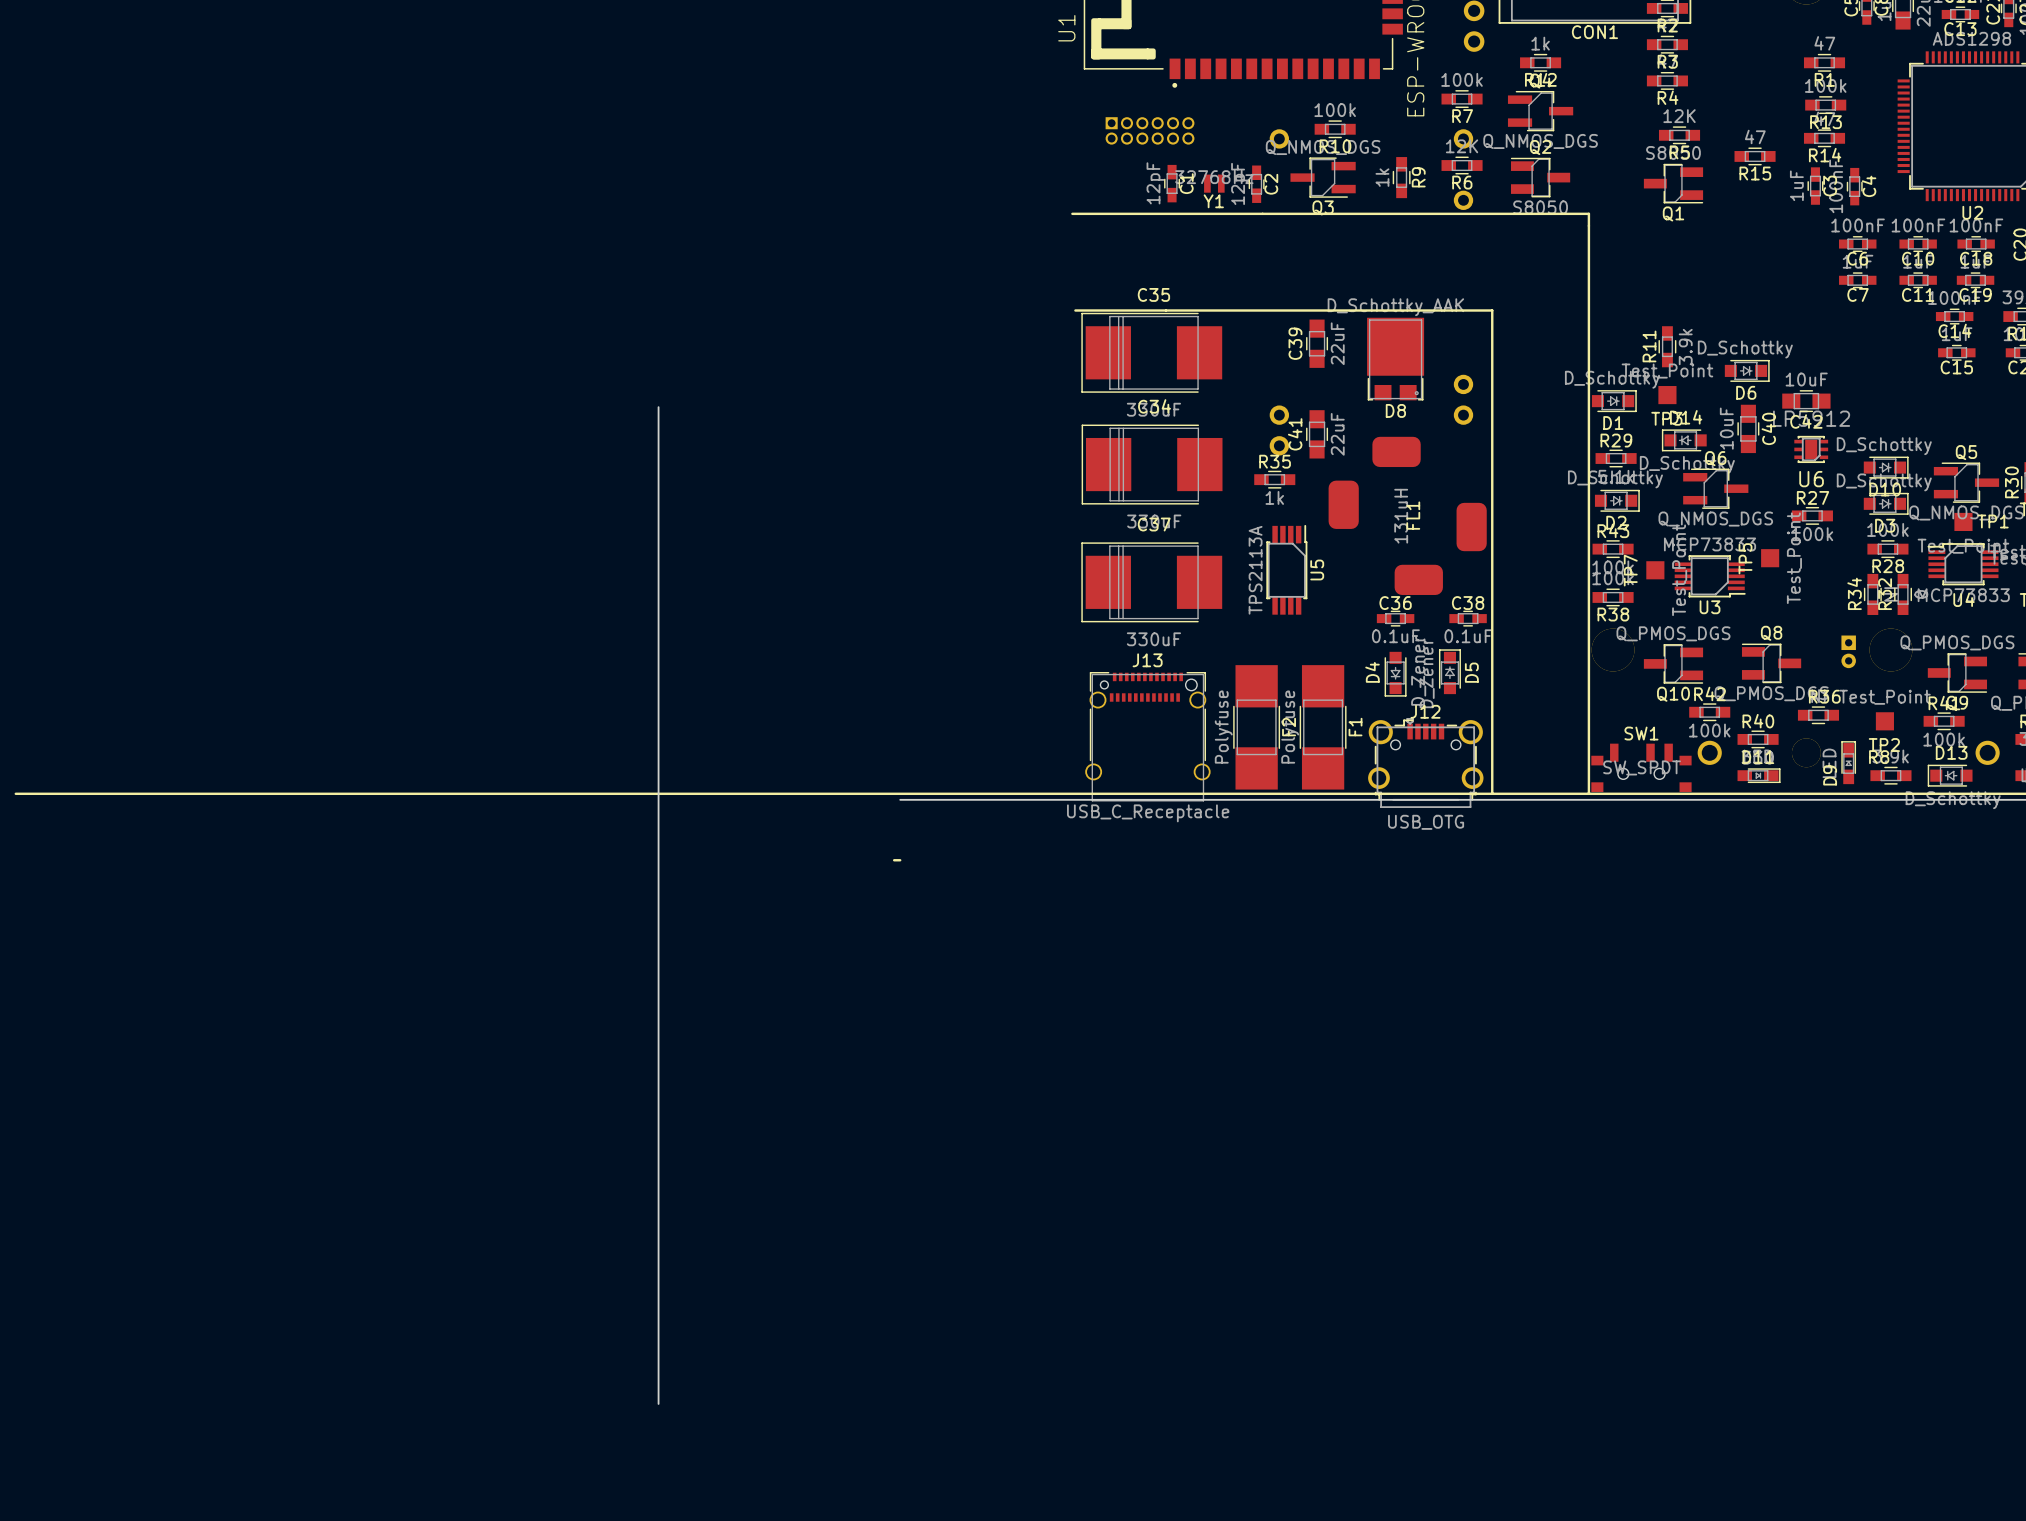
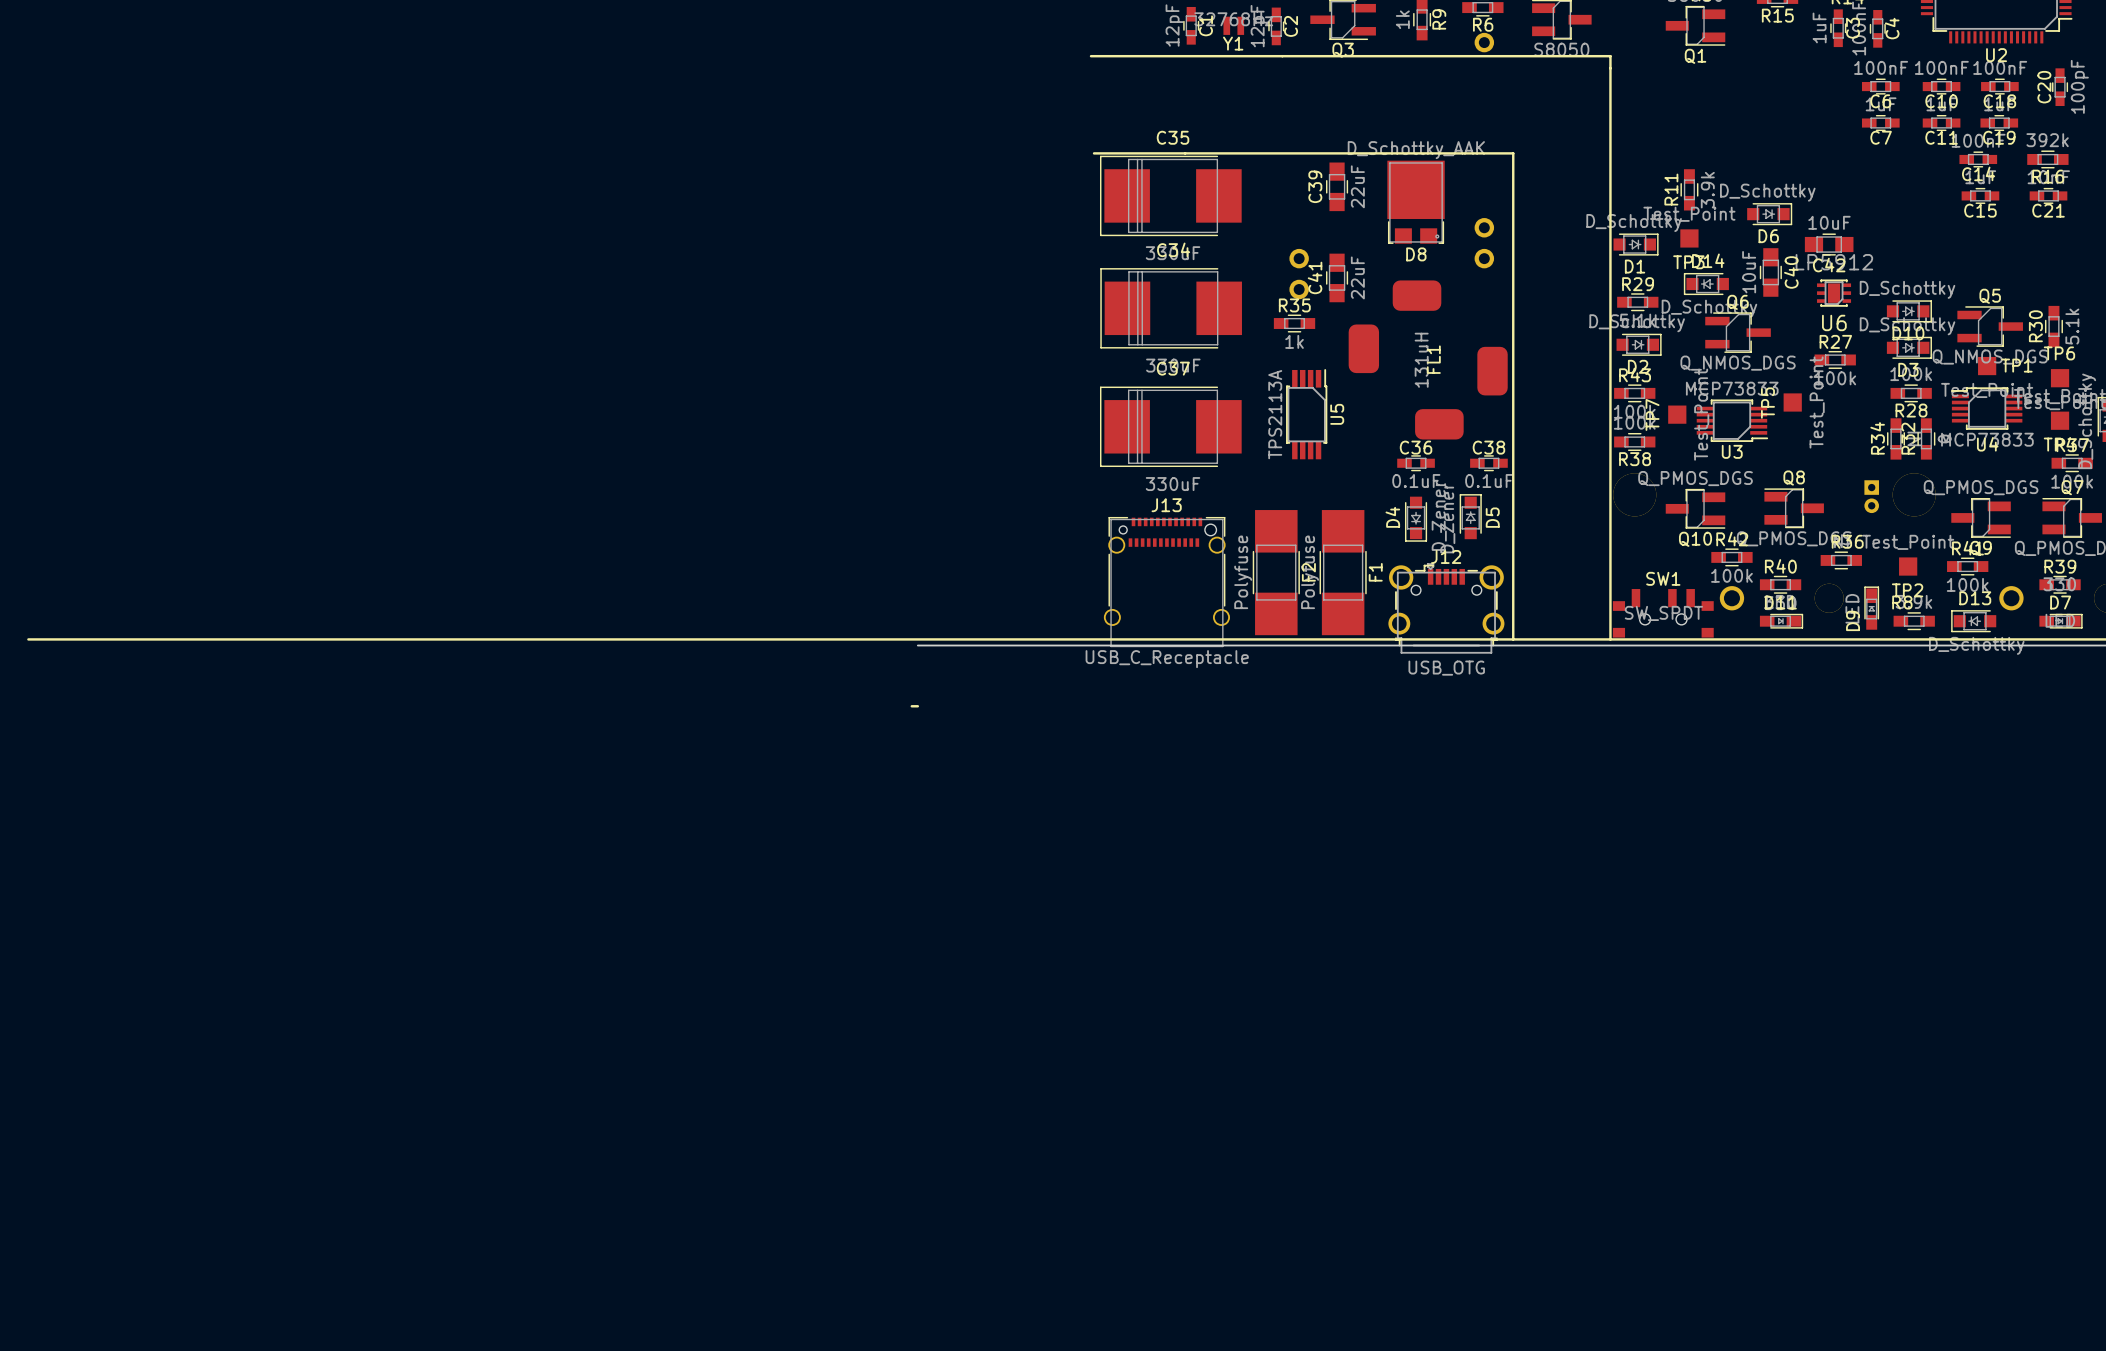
board edge: (658, 407) (658, 1403) -> none

